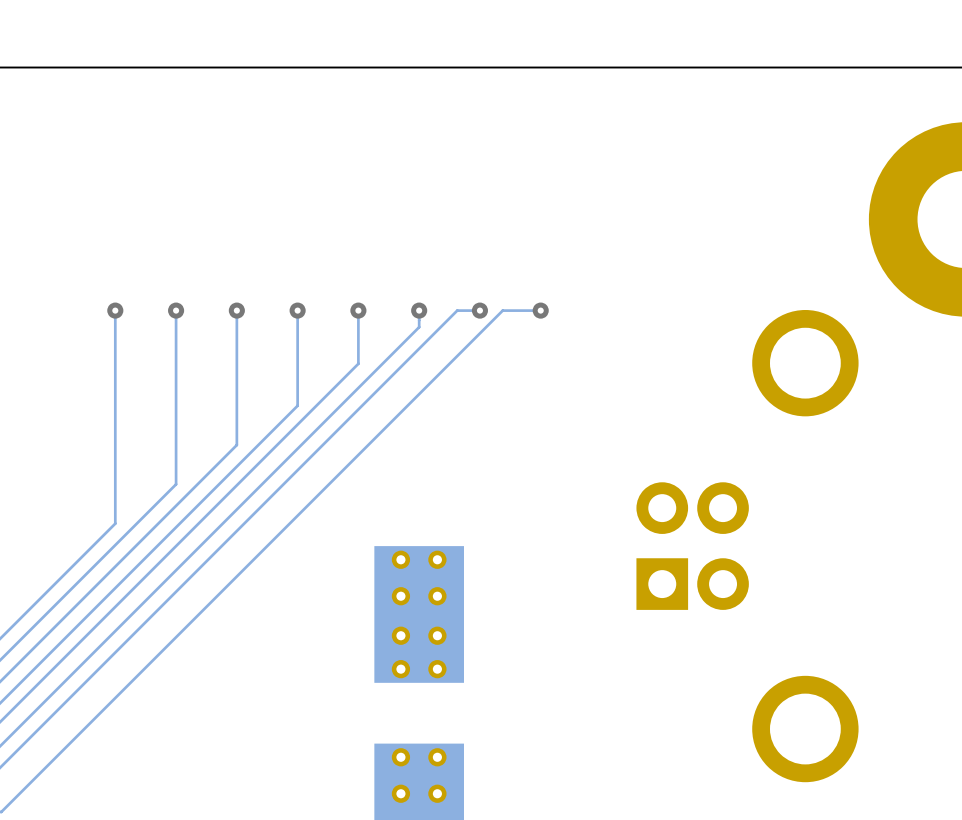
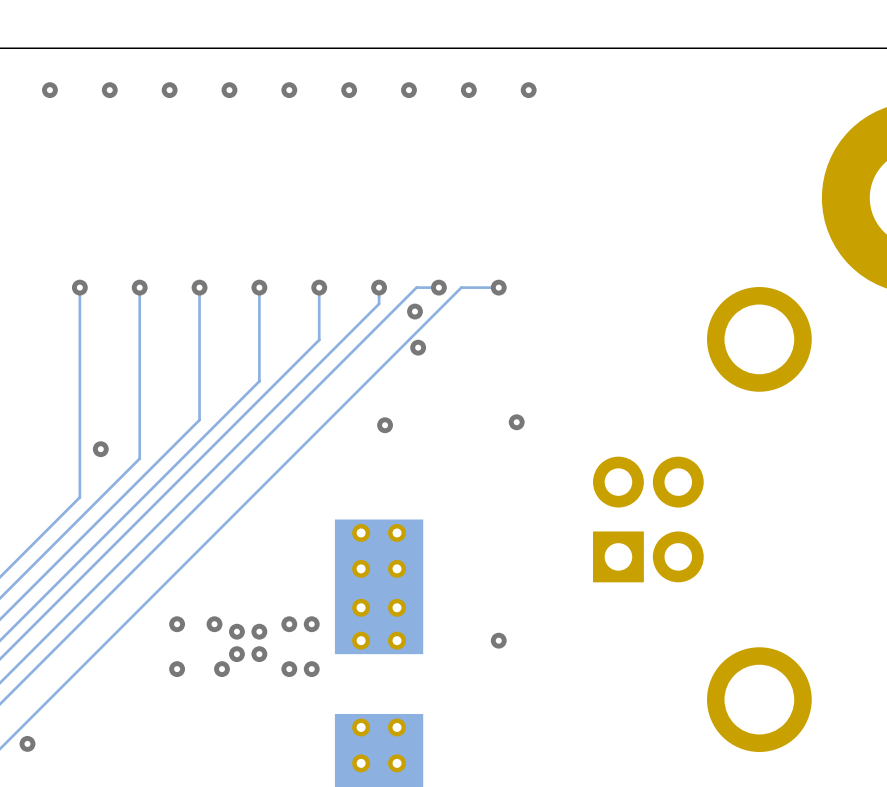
via: none -> (49, 90)
via: none -> (109, 90)
via: none -> (169, 90)
via: none -> (229, 90)
via: none -> (289, 90)
via: none -> (349, 90)
via: none -> (408, 90)
via: none -> (468, 90)
via: none -> (528, 90)
via: none -> (414, 311)
via: none -> (418, 347)
via: none -> (516, 422)
via: none -> (385, 425)
via: none -> (100, 449)
via: none -> (177, 624)
via: none -> (214, 624)
via: none -> (289, 624)
via: none -> (311, 624)
via: none -> (236, 631)
via: none -> (259, 631)
via: none -> (498, 640)
via: none -> (236, 654)
via: none -> (259, 654)
via: none -> (177, 669)
via: none -> (221, 669)
via: none -> (289, 669)
via: none -> (311, 669)
via: none -> (27, 743)

